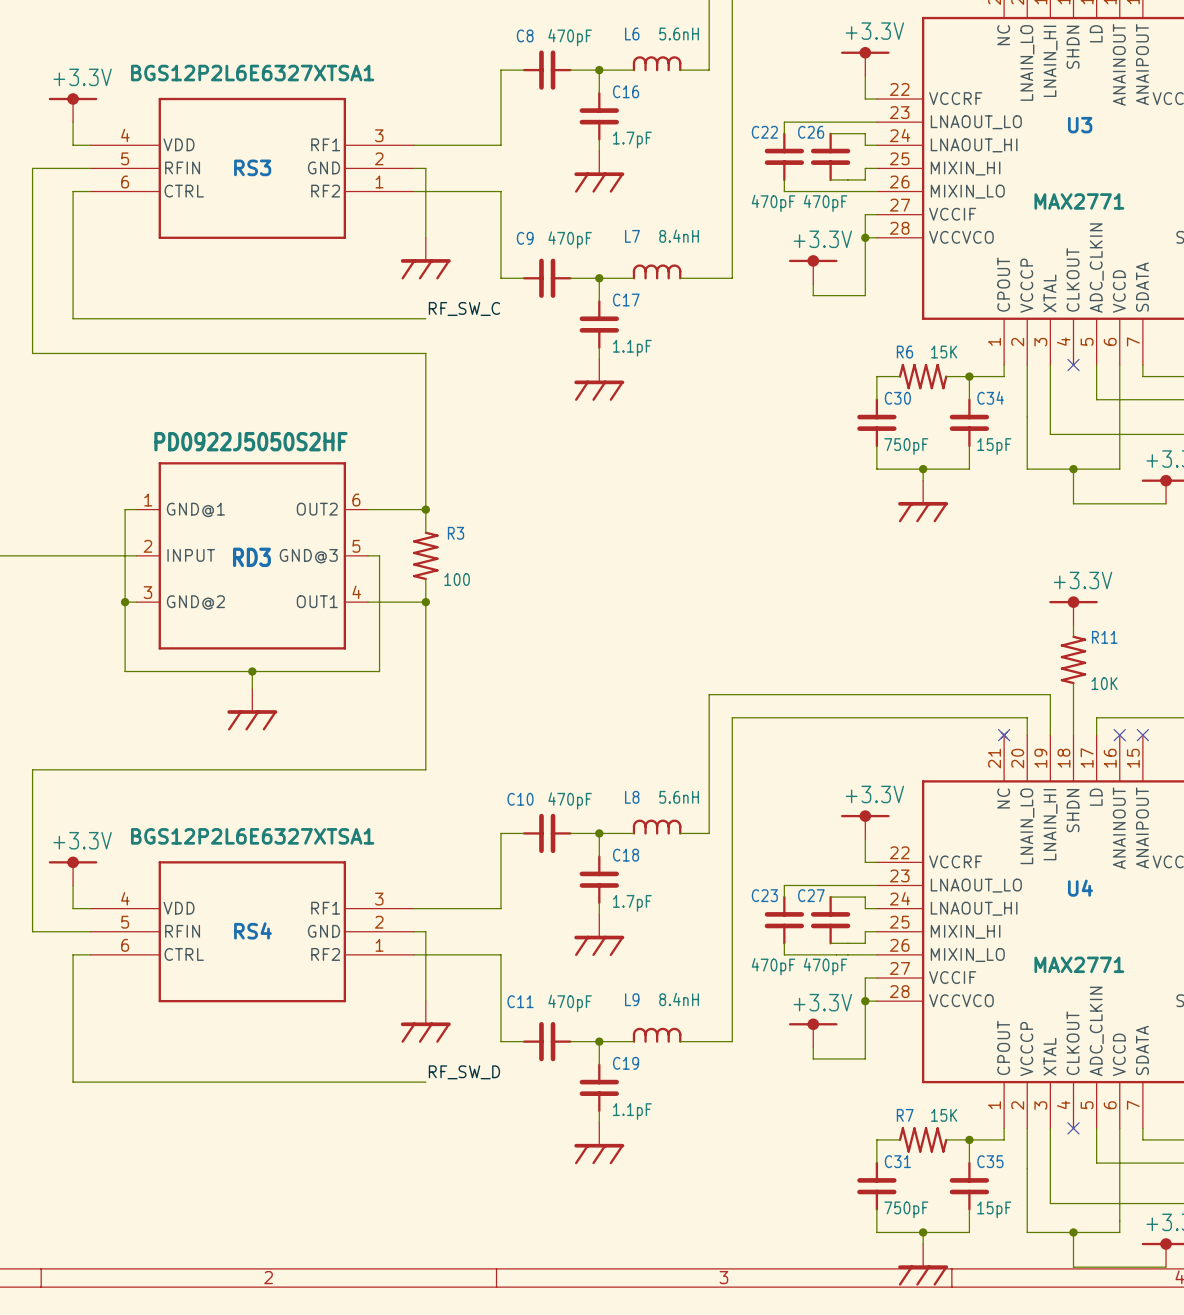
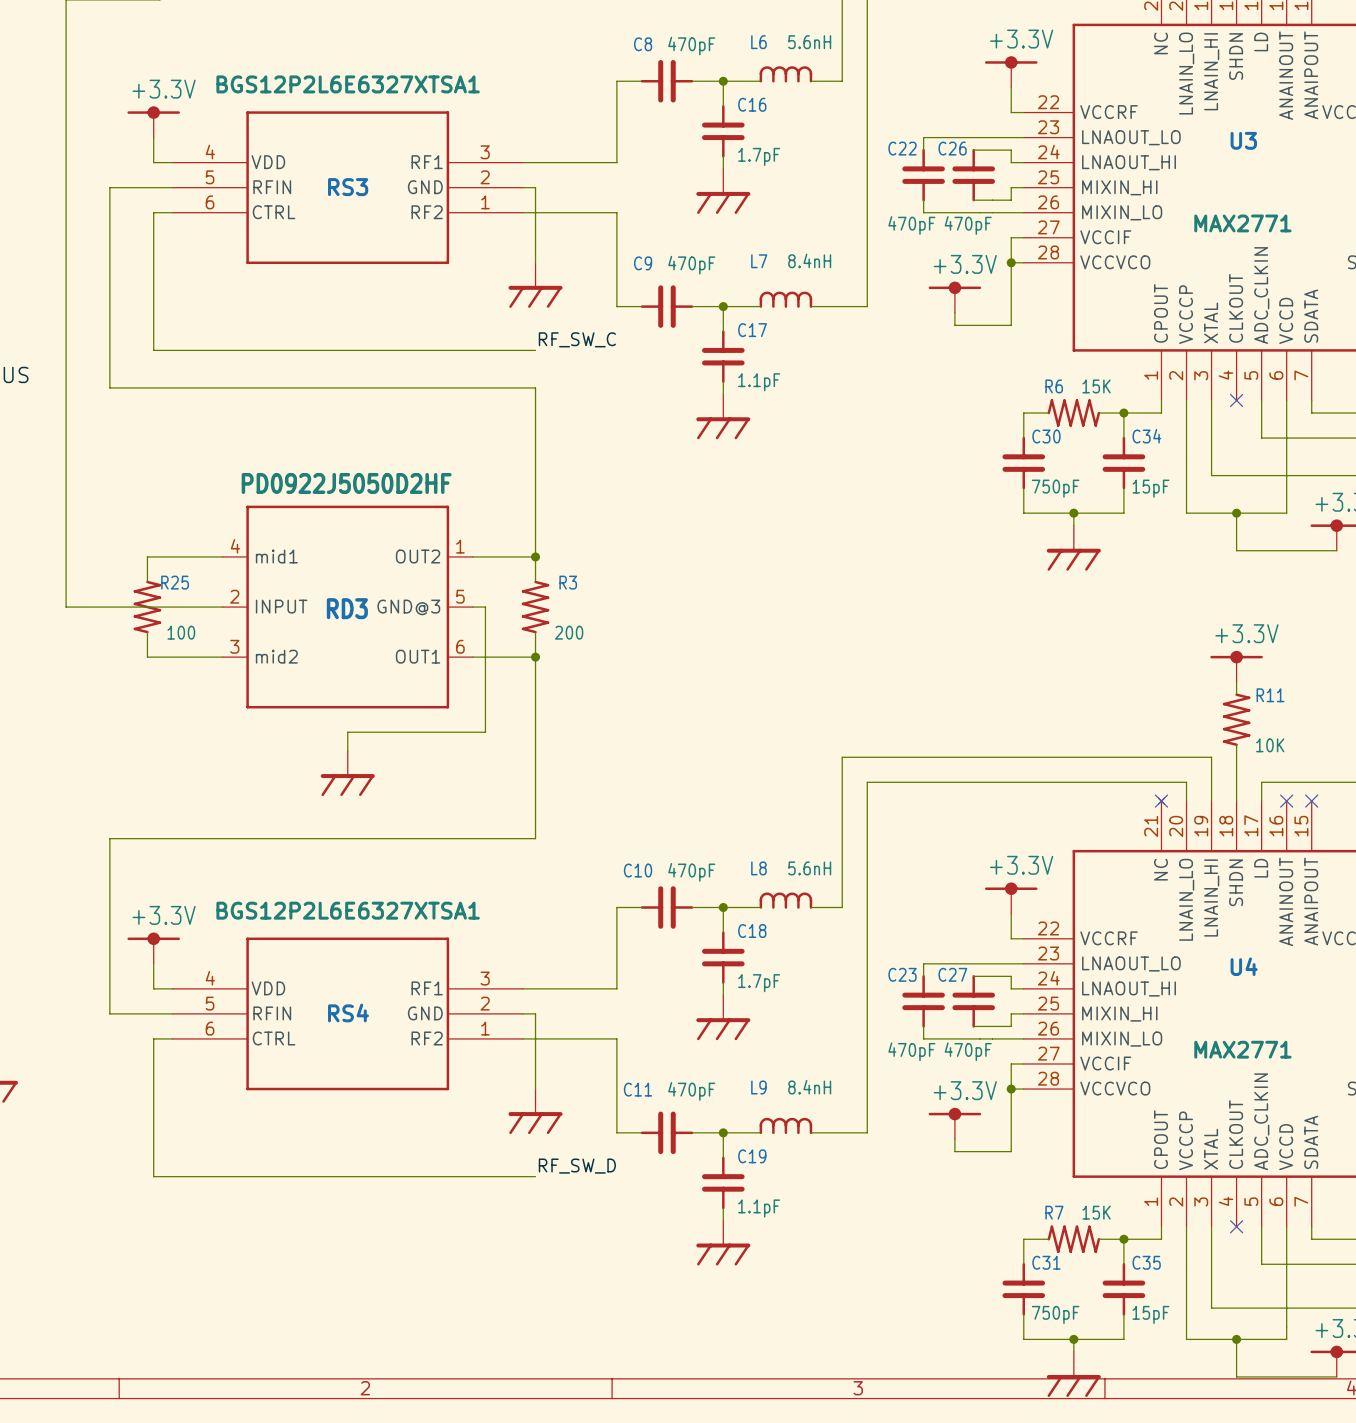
RD3 value: PD0922J5050S2HF (250, 441) -> PD0922J5050D2HF (346, 483)
RD3 pin number: 1 (148, 500) -> 4 (235, 546)
RD3 pin number: 6 (356, 500) -> 1 (460, 546)
wire: (125, 509) (125, 671) (252, 671) -> (210, 556) (147, 556) (147, 582)
RD3 pin name: GND@1 (195, 509) -> mid1 (276, 556)
R25: none -> 100 (147, 607)
wire: none -> (147, 632) (147, 657) (210, 657)
R3 value: 100 (457, 579) -> 200 (569, 632)
RD3 pin number: 4 (356, 592) -> 6 (460, 646)
junction: (125, 602) -> none
RD3 pin name: GND@2 (195, 602) -> mid2 (276, 656)
junction: (252, 671) -> none

